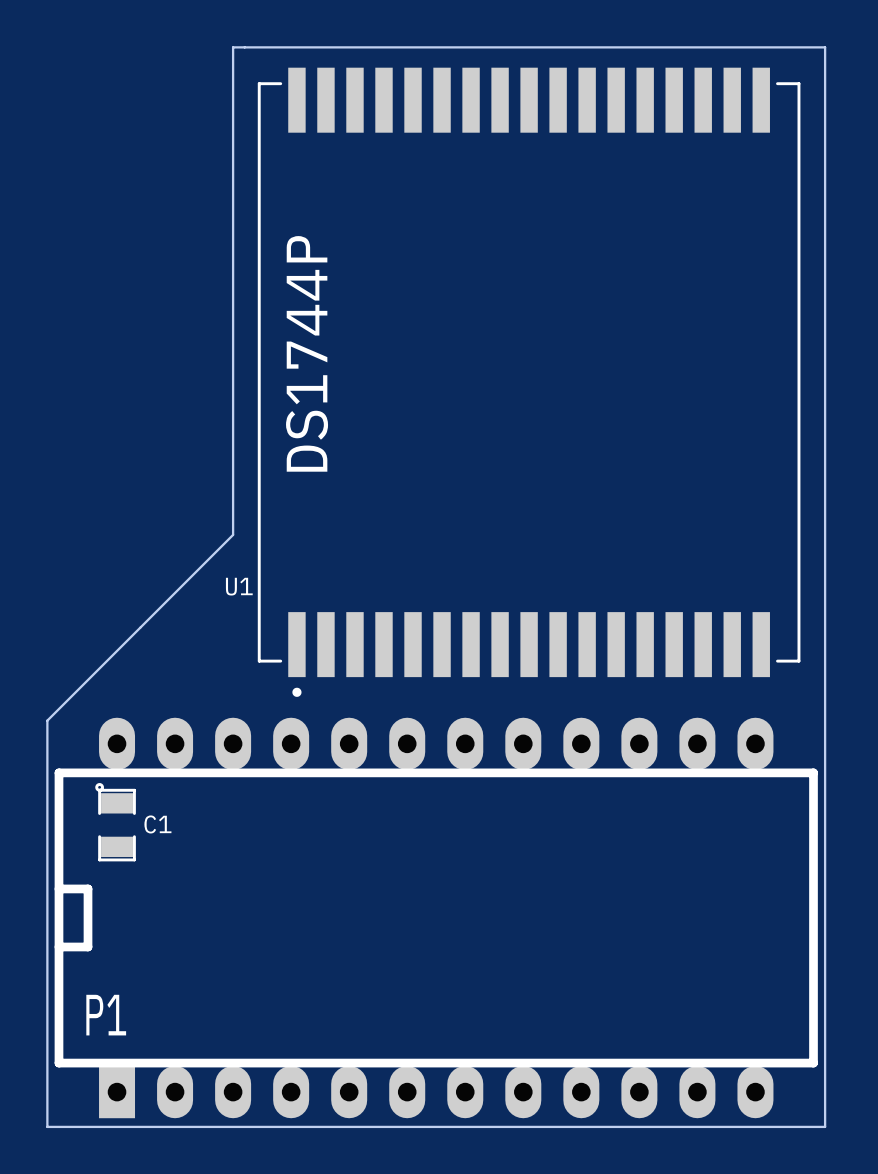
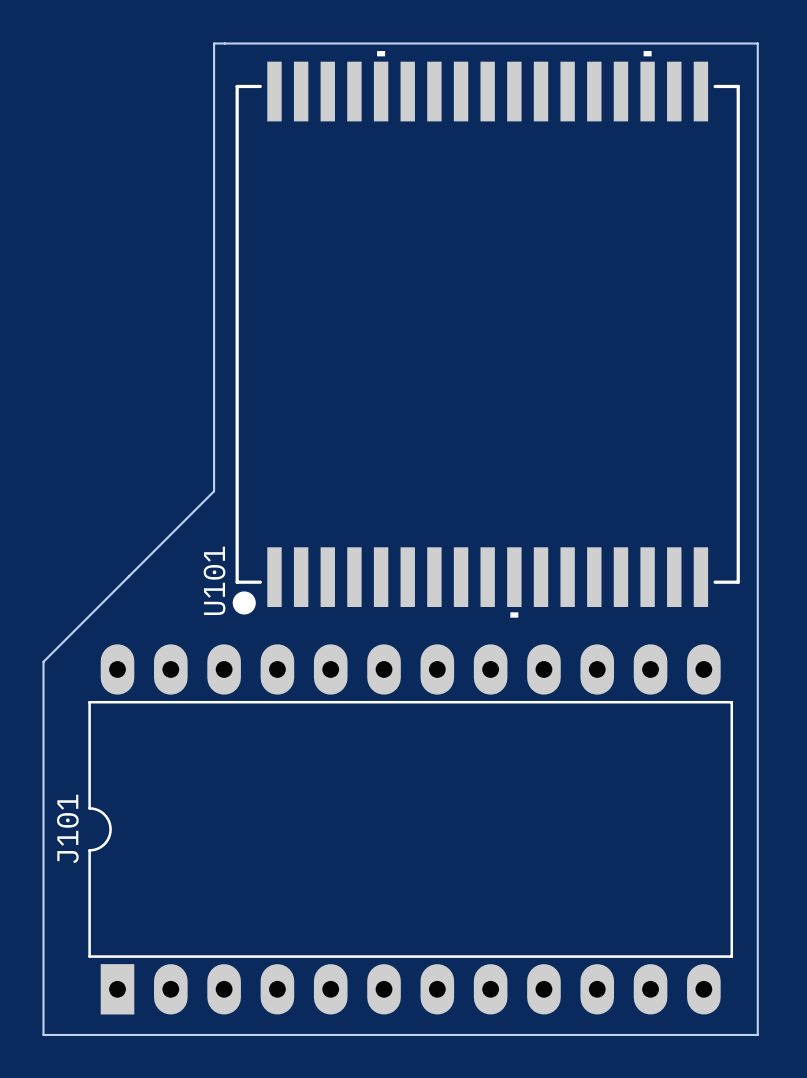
U101: none -> (486, 334)
U1: DS1744P (529, 382) -> none
C1: (115, 822) -> none
J101: none -> (410, 829)
P1: (436, 917) -> none

